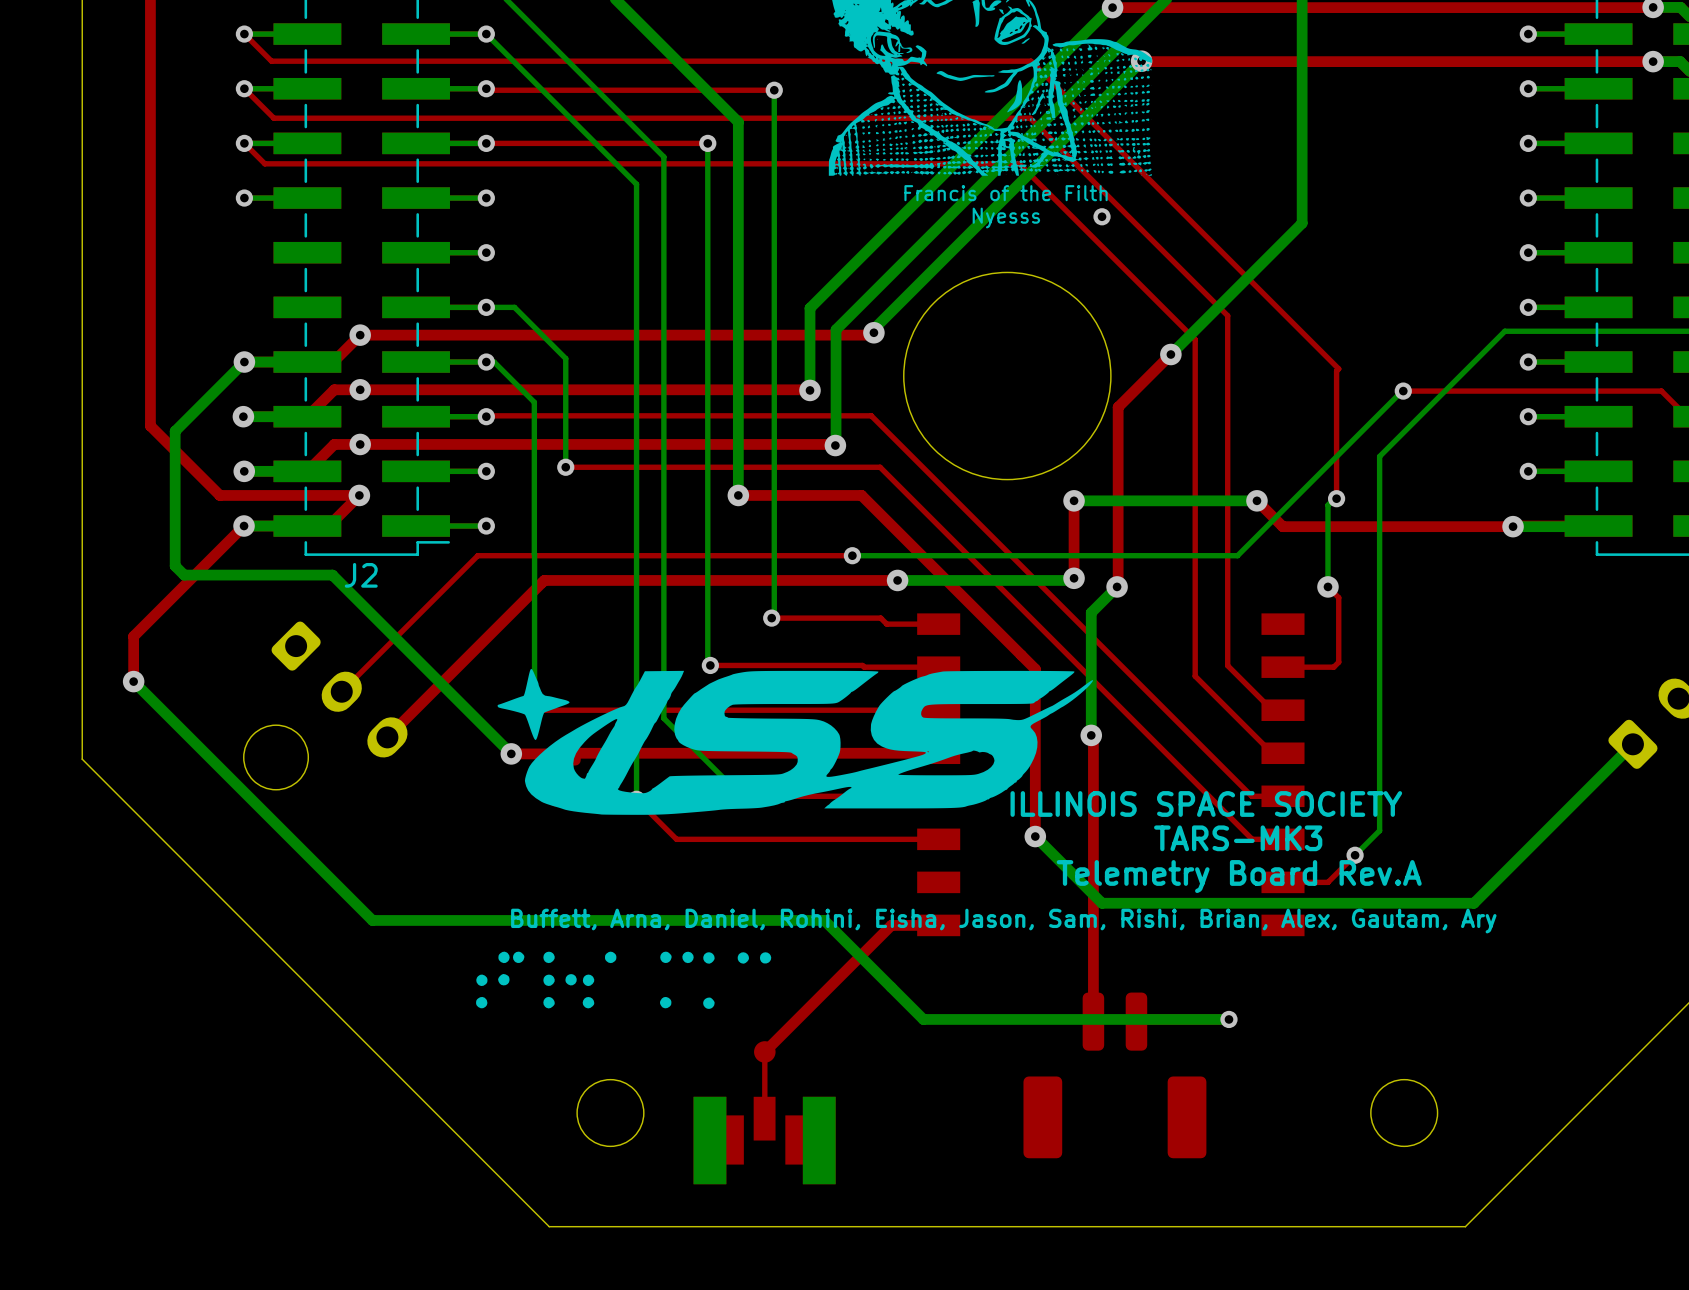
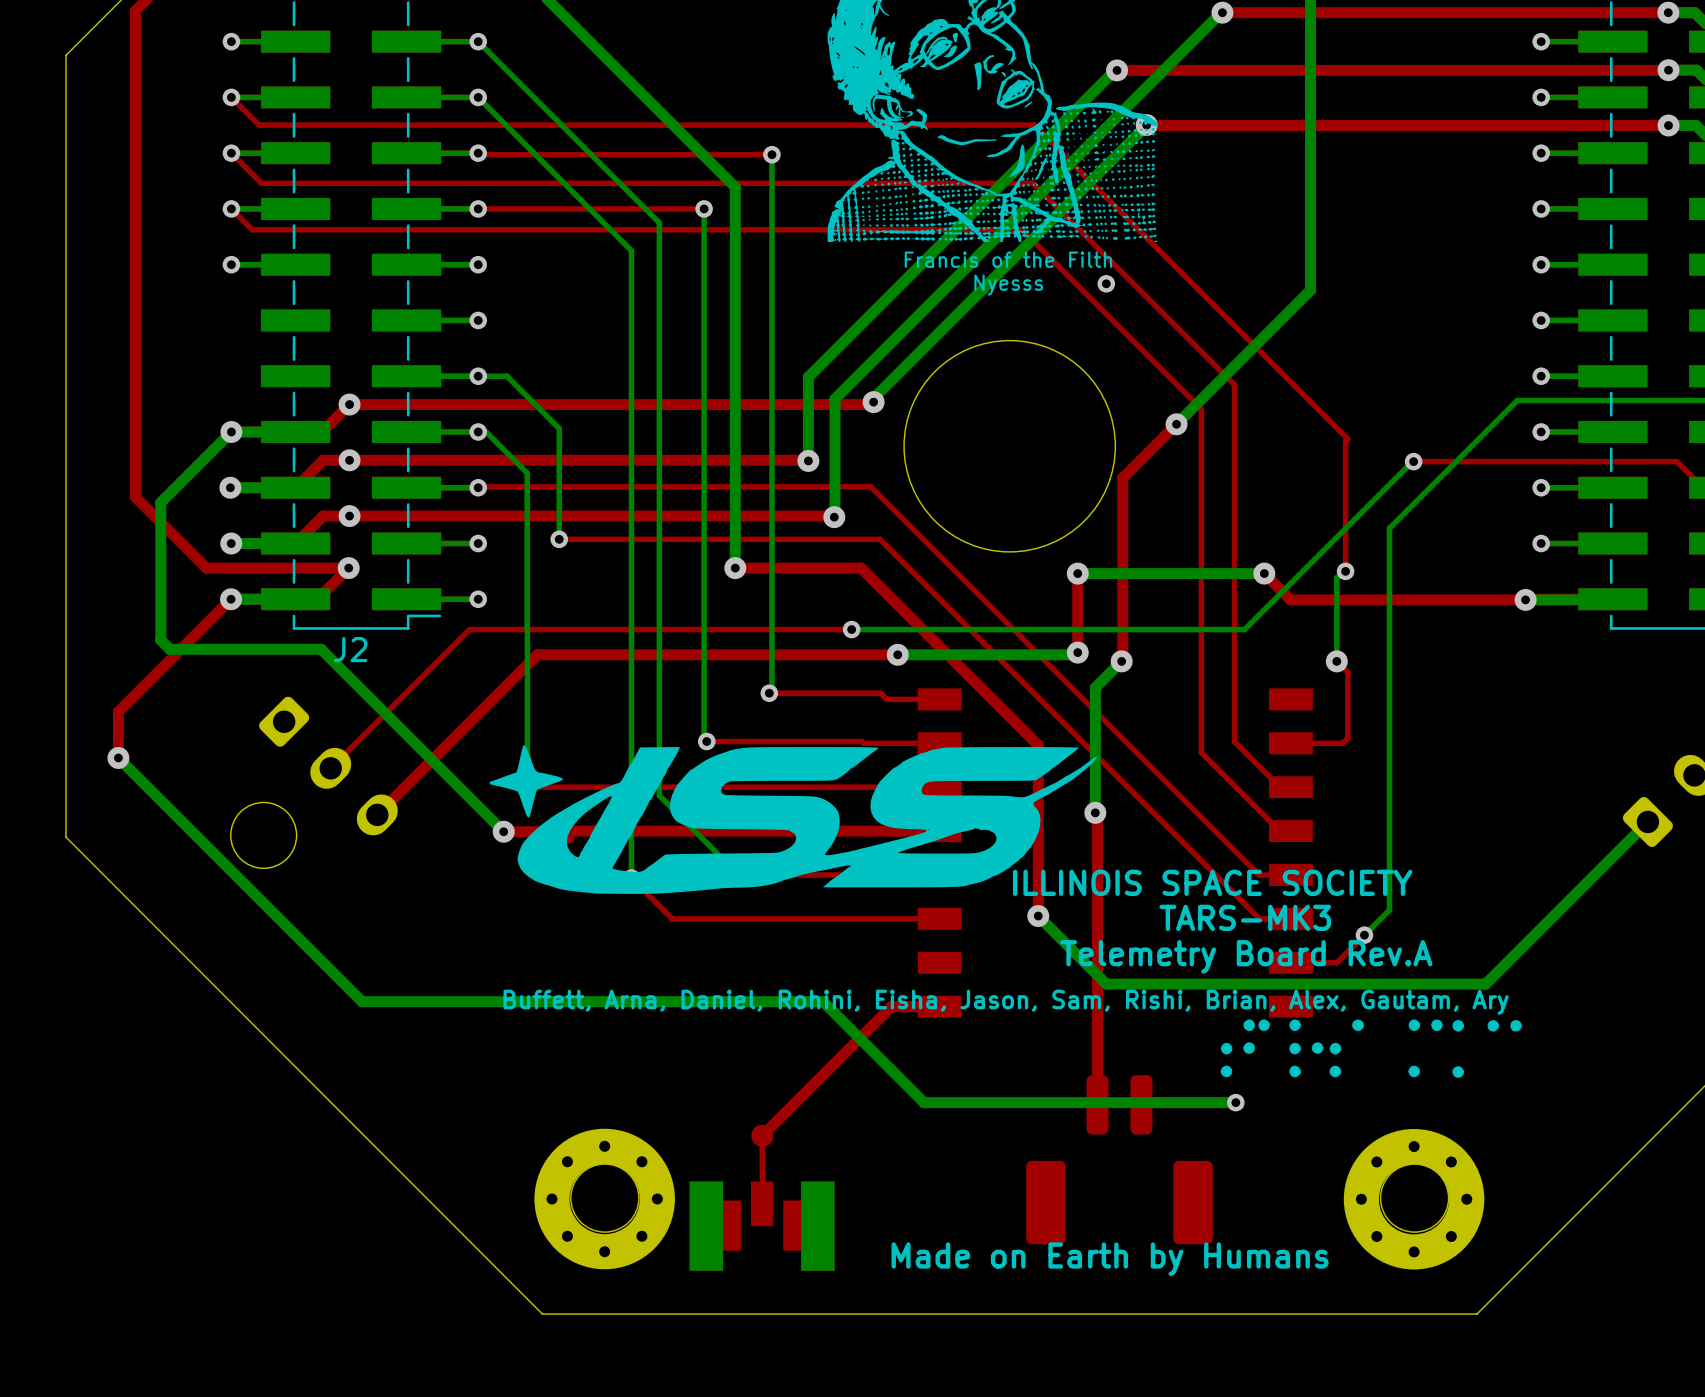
drawing: none -> [1220, 1019, 1522, 1078]
drawing: [476, 951, 772, 1009] -> none
part: none -> (604, 1199)
part: none -> (1414, 1199)
text: none -> Made on Earth by Humans (1110, 1259)

